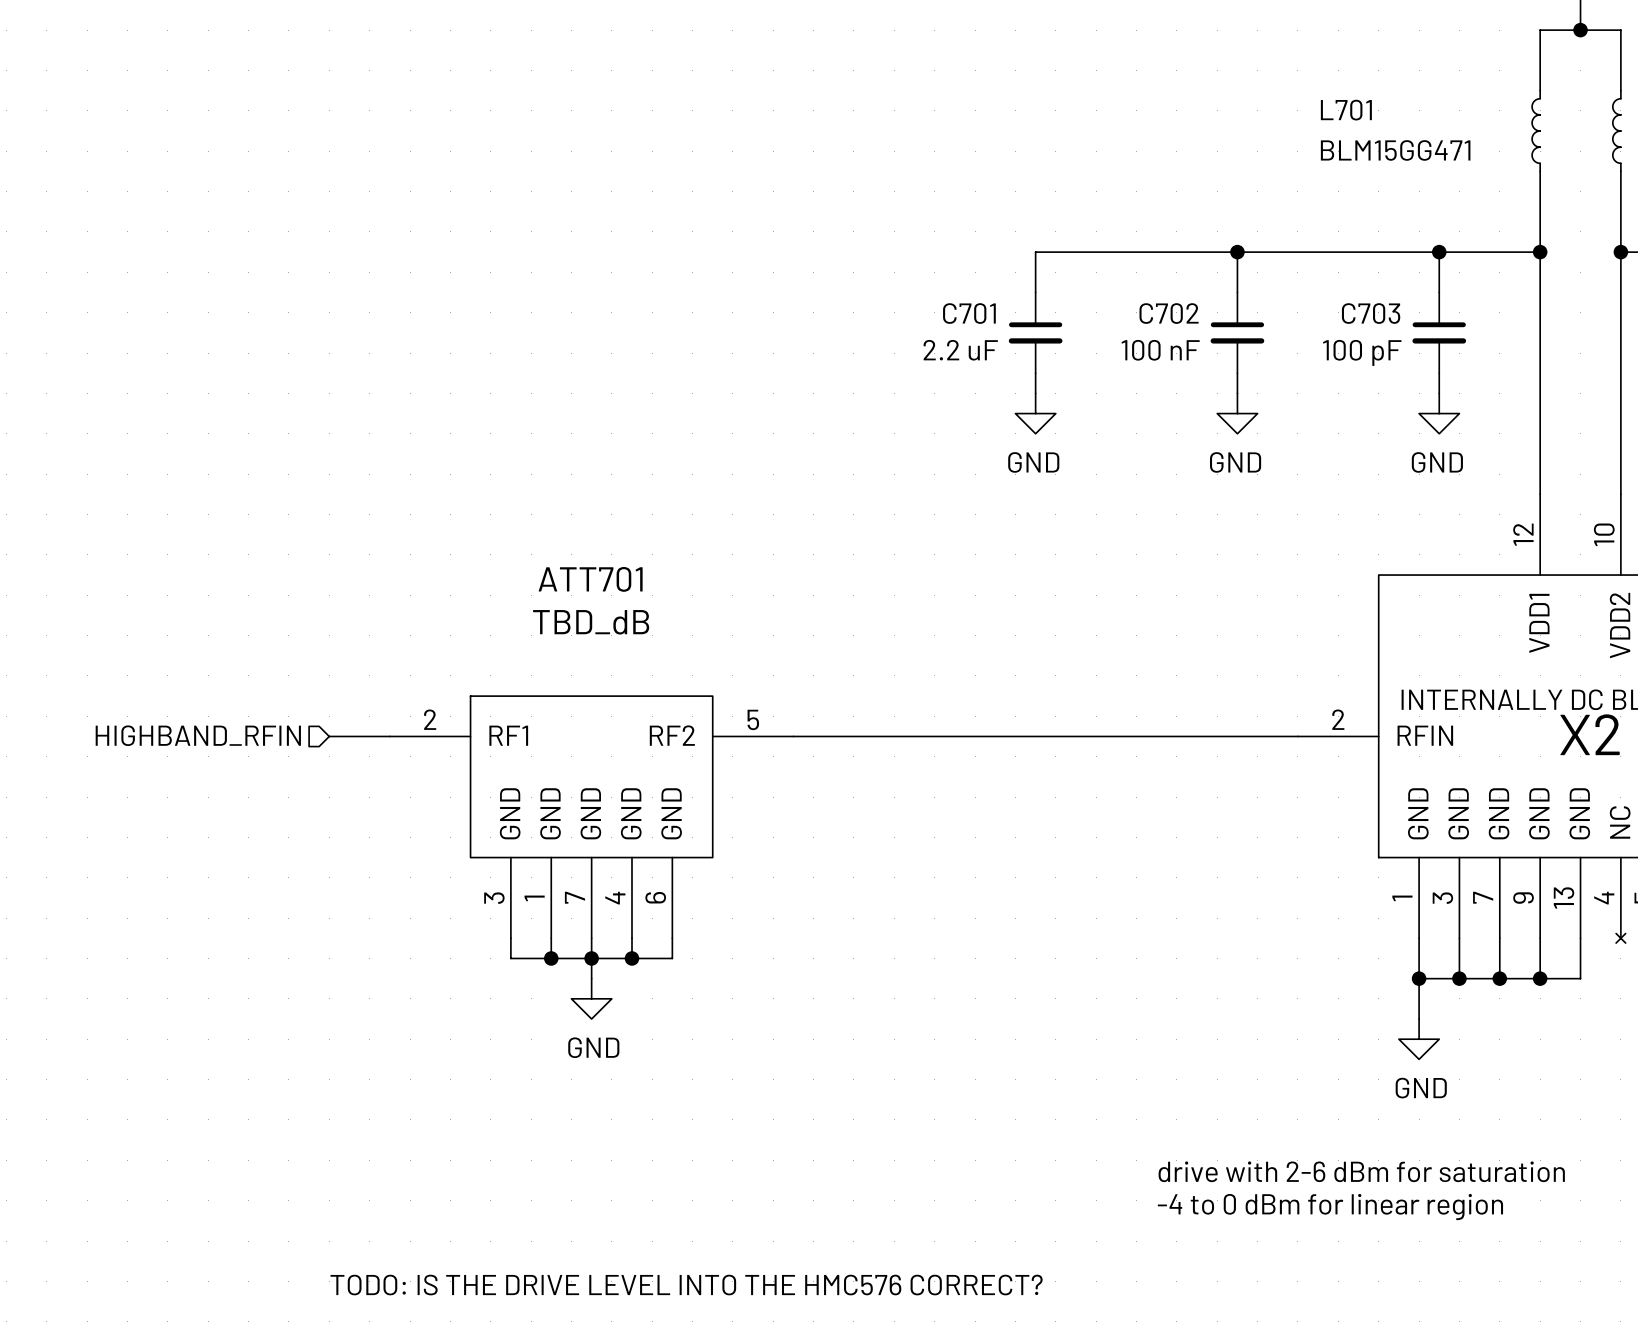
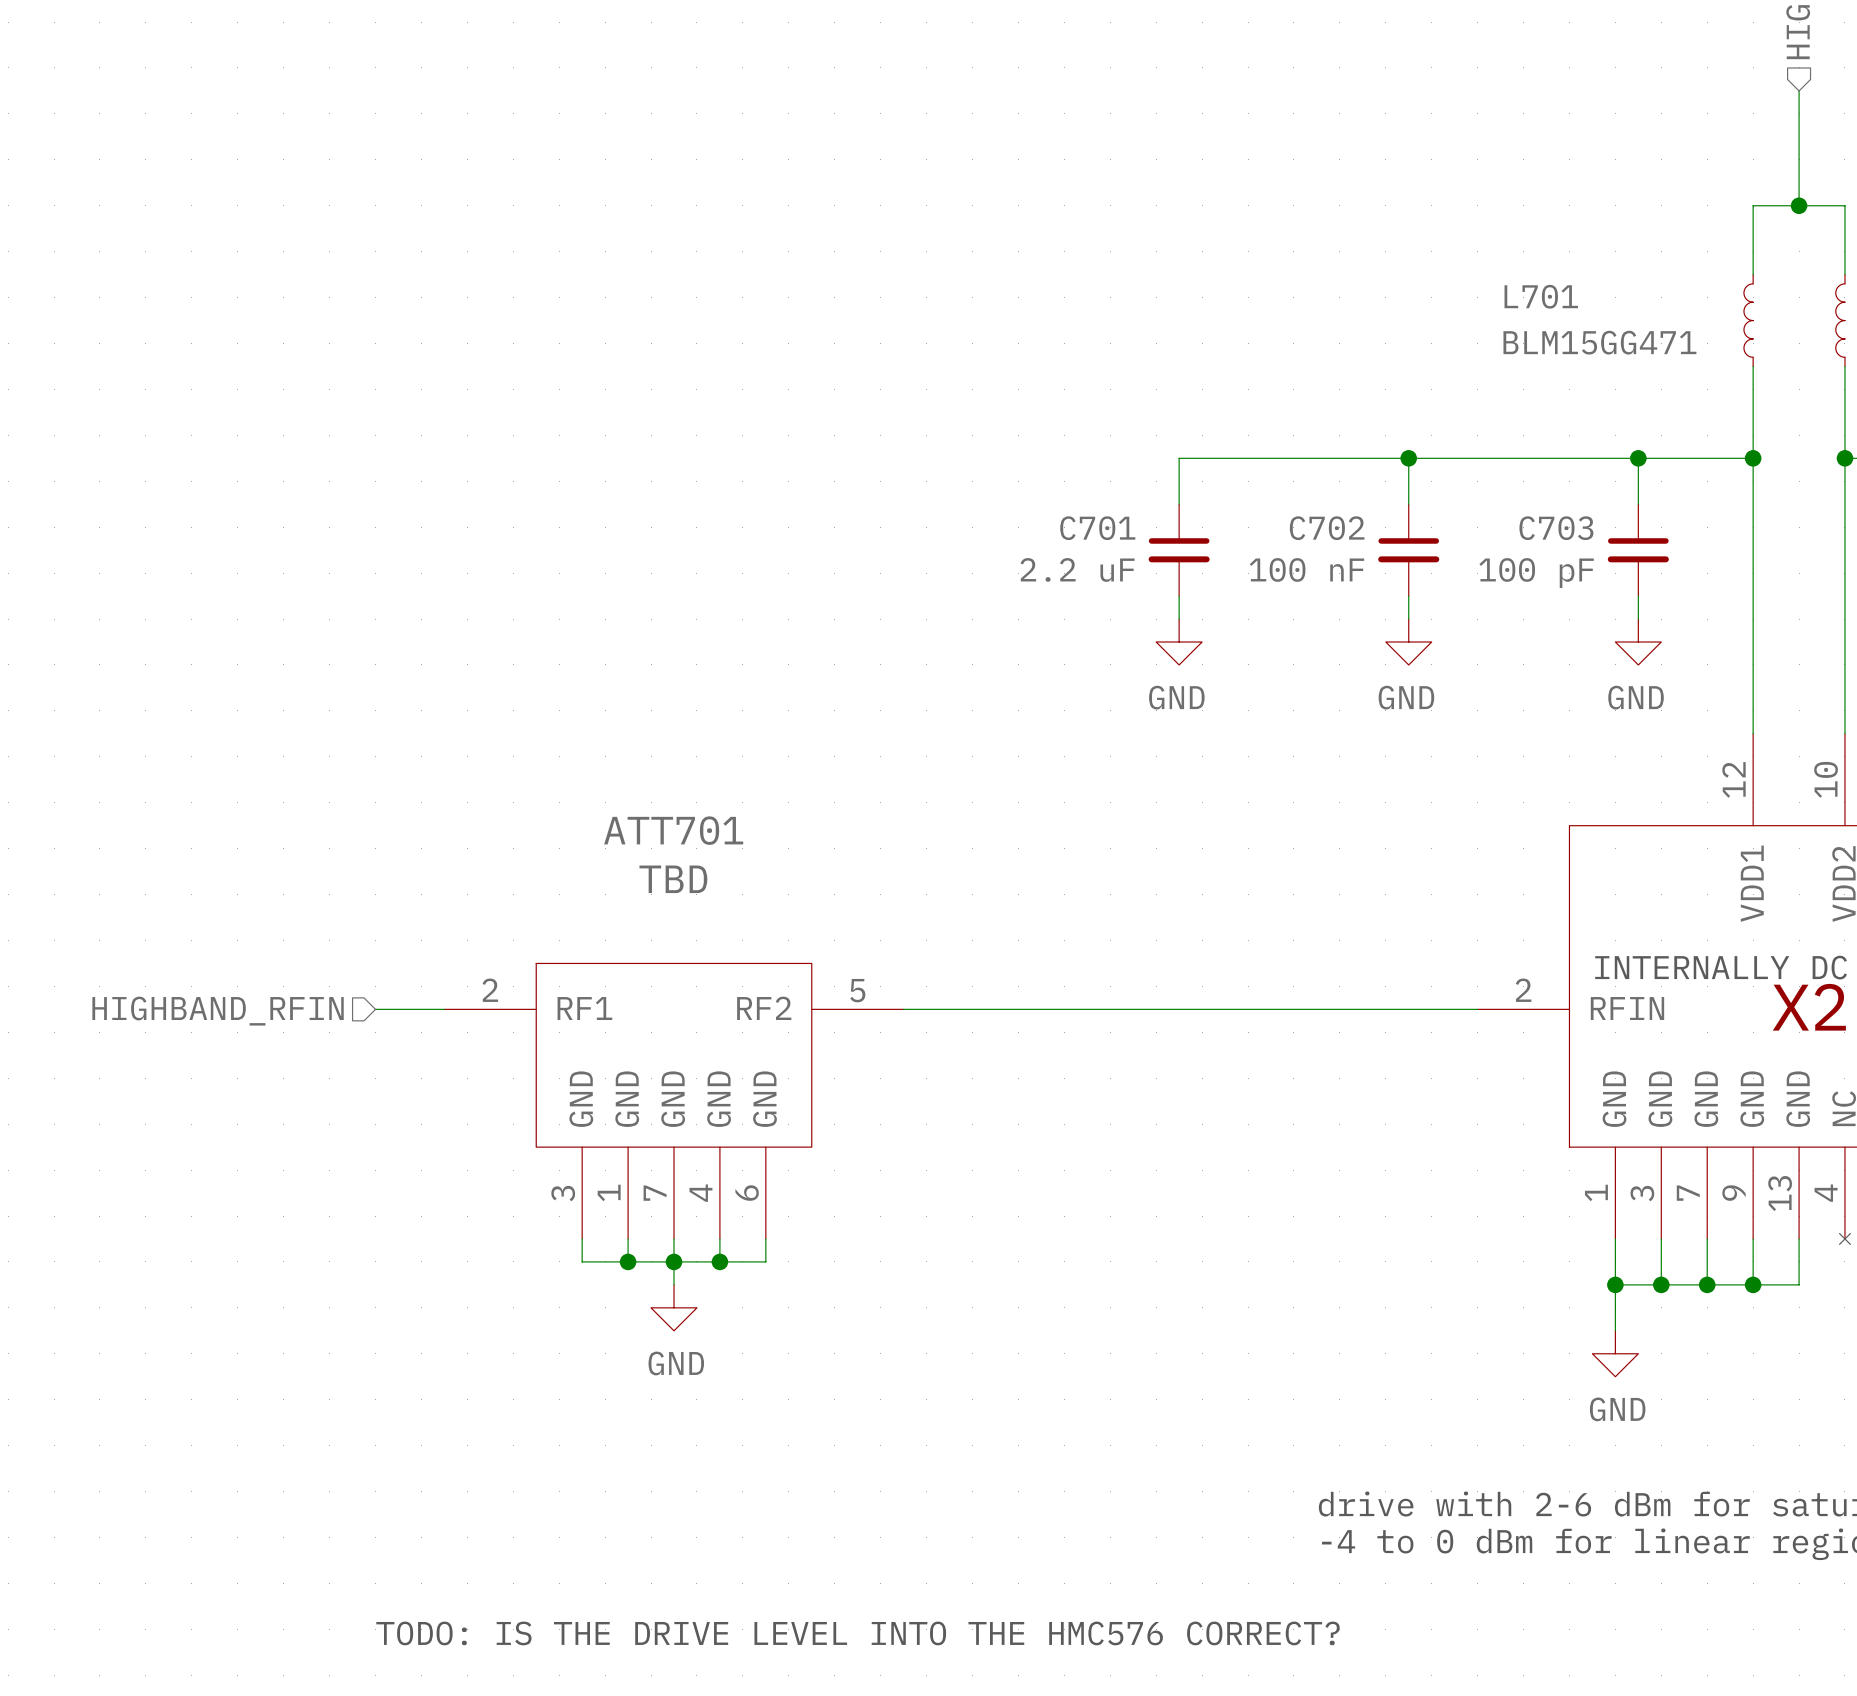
ATT701 value: TBD_dB (591, 622) -> TBD (673, 879)

